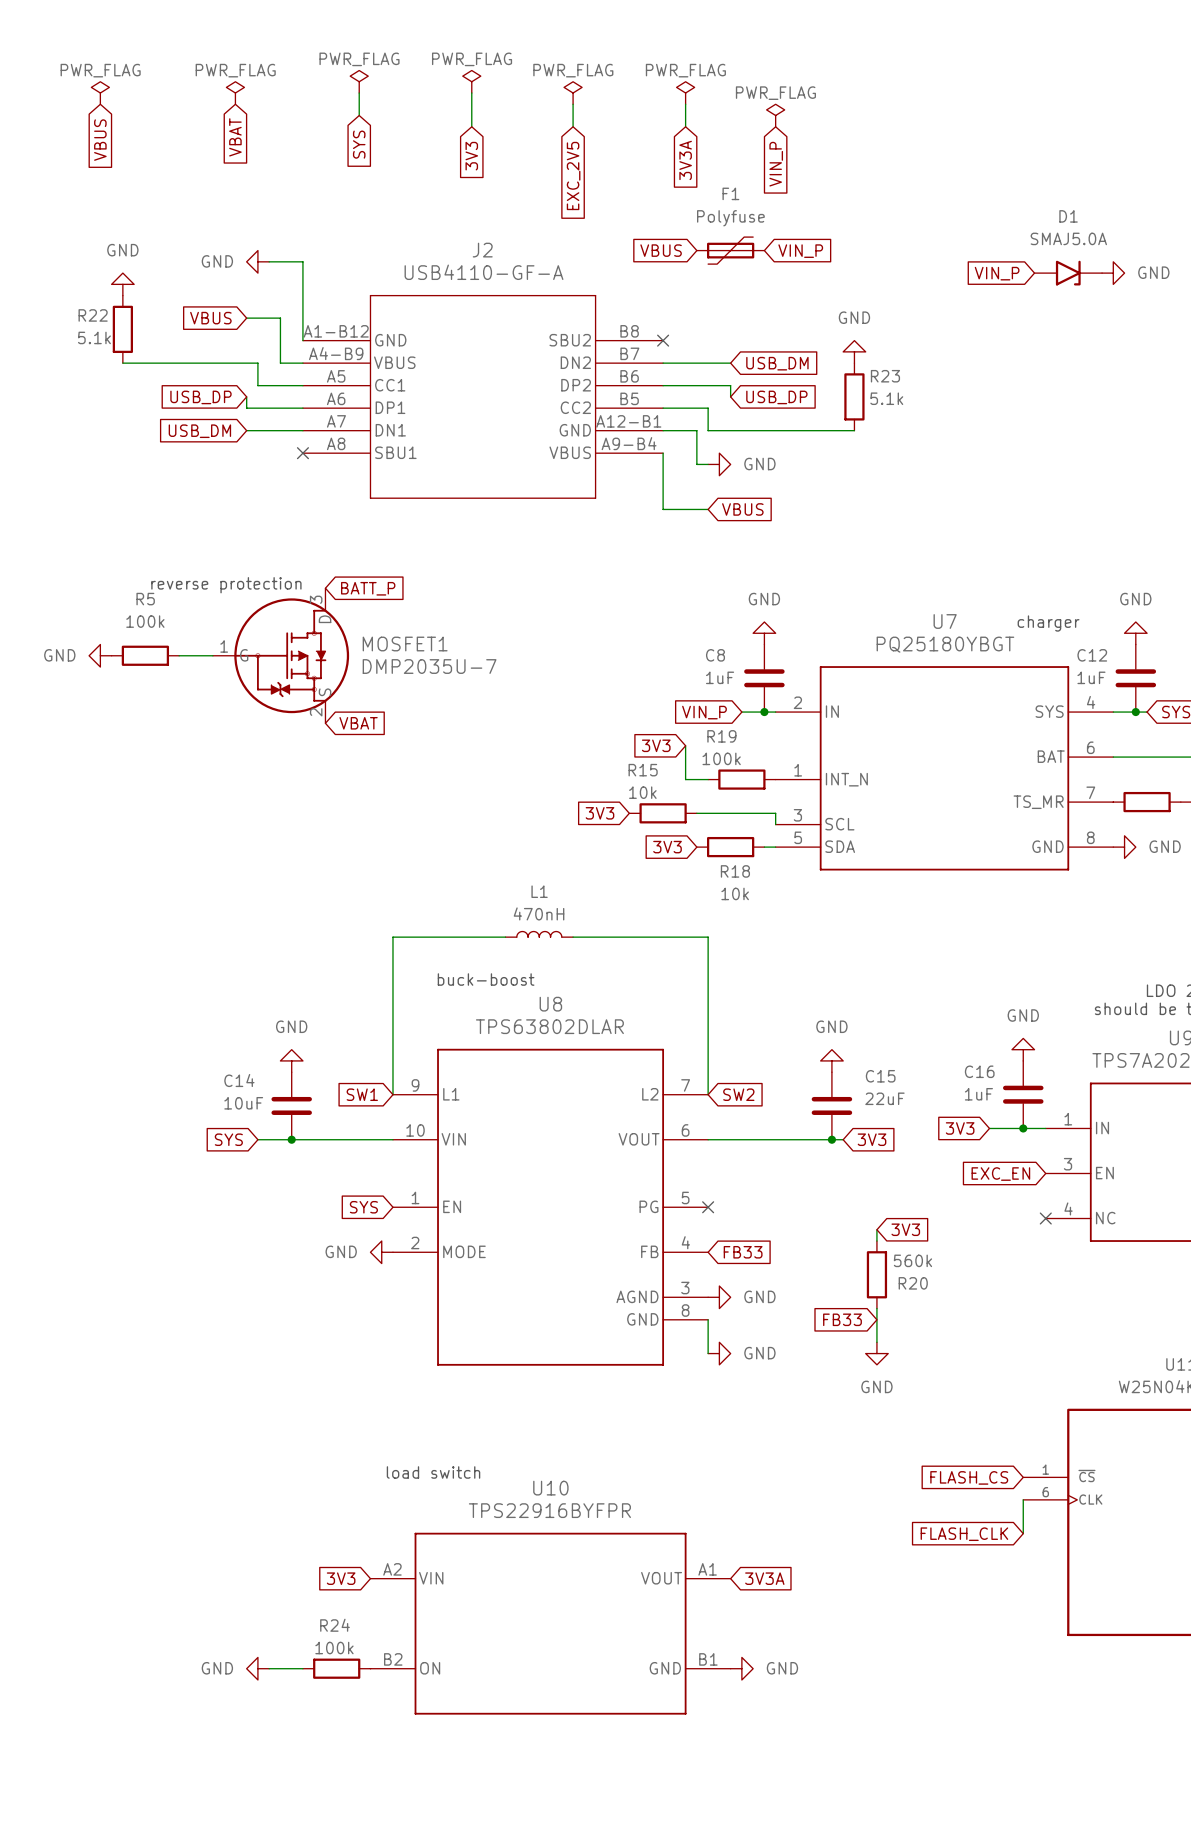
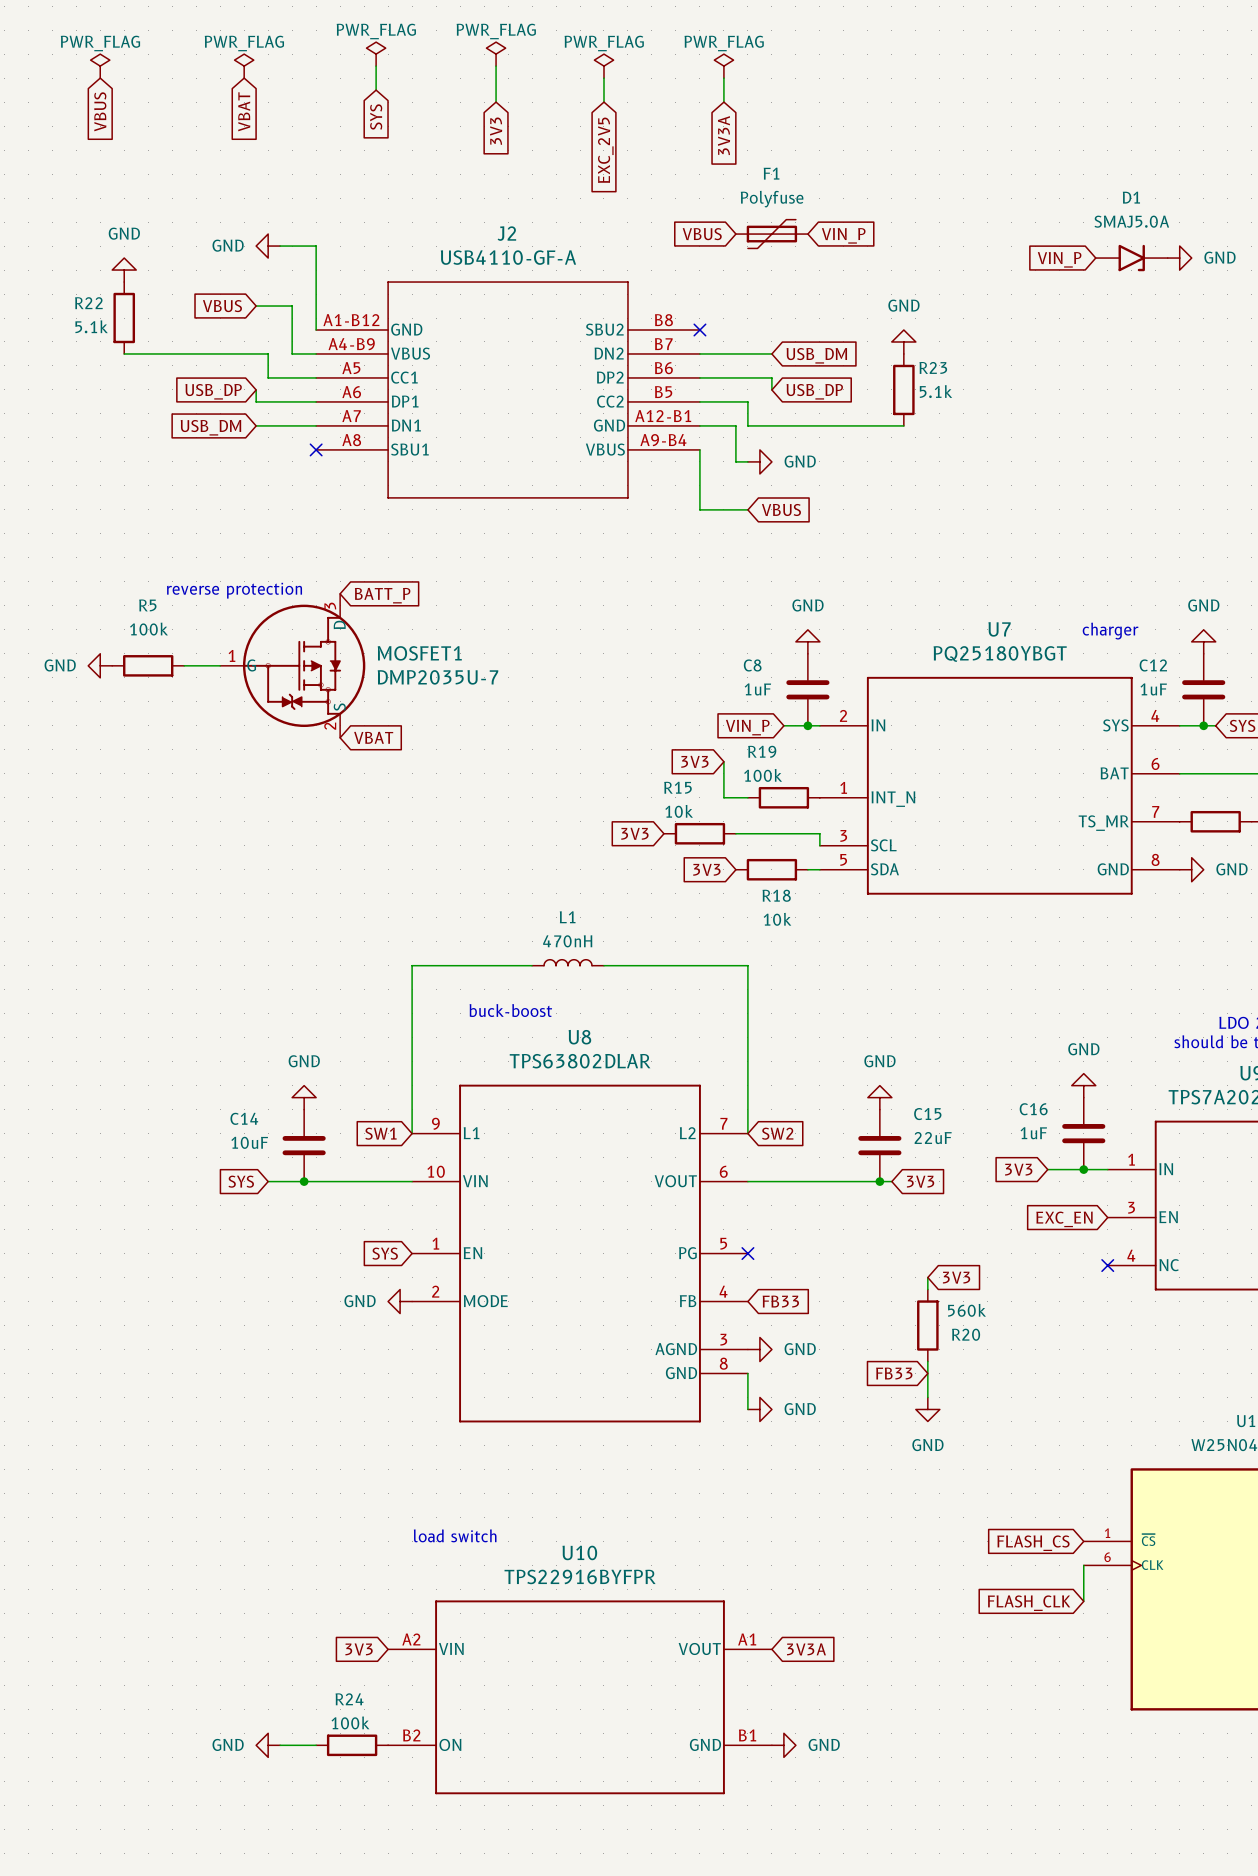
power symbol: PWR_FLAG (775, 115) -> none
global label: VIN_P (776, 164) -> none

